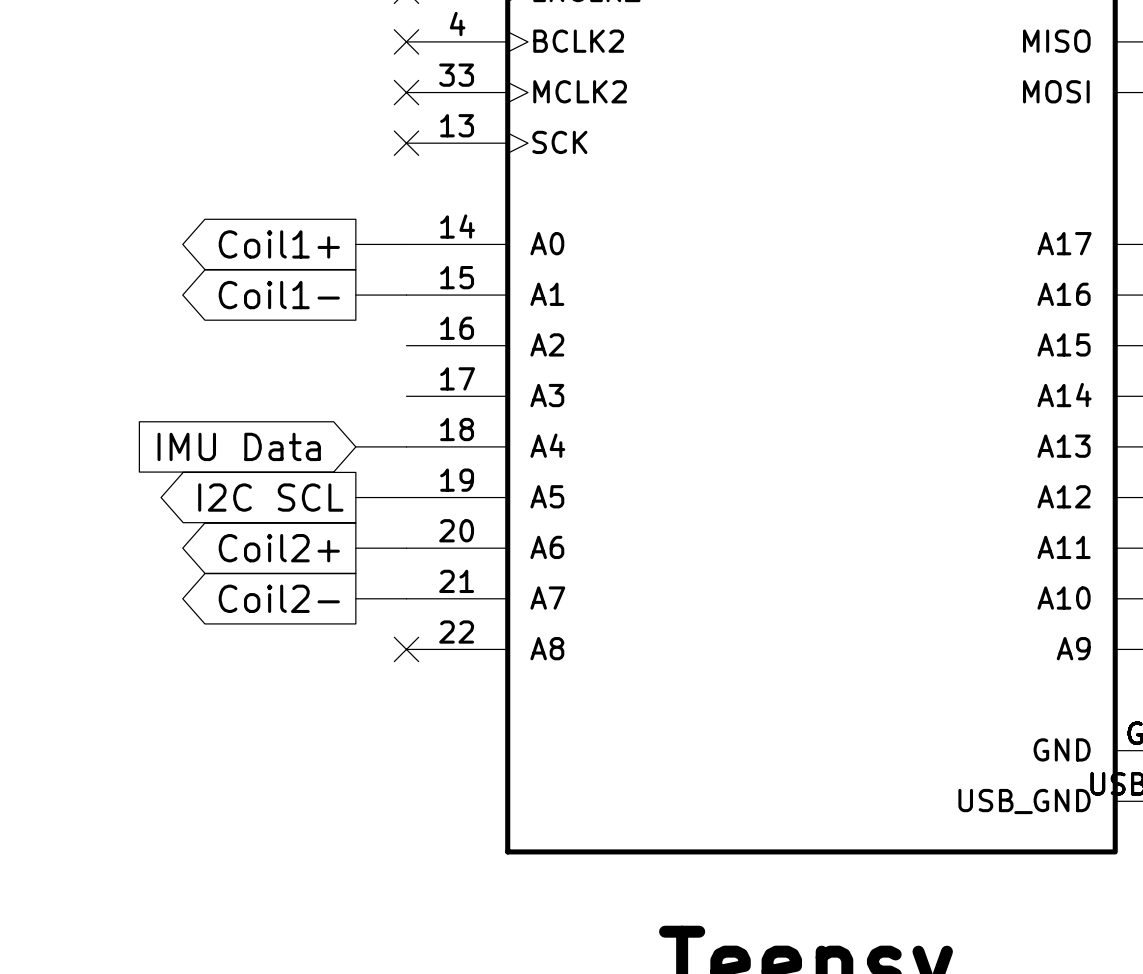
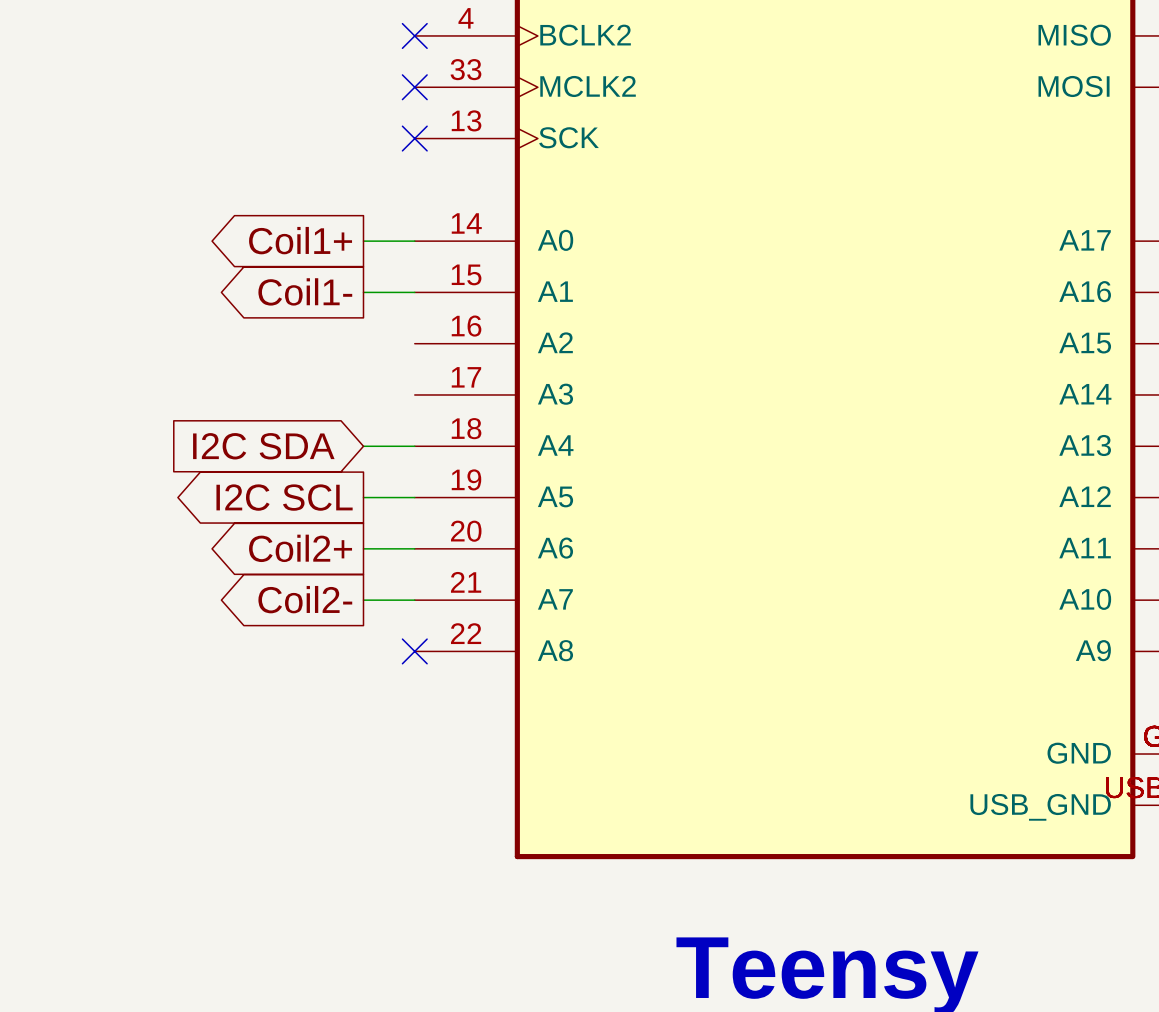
global label: IMU Data (239, 446) -> I2C SDA (263, 446)

